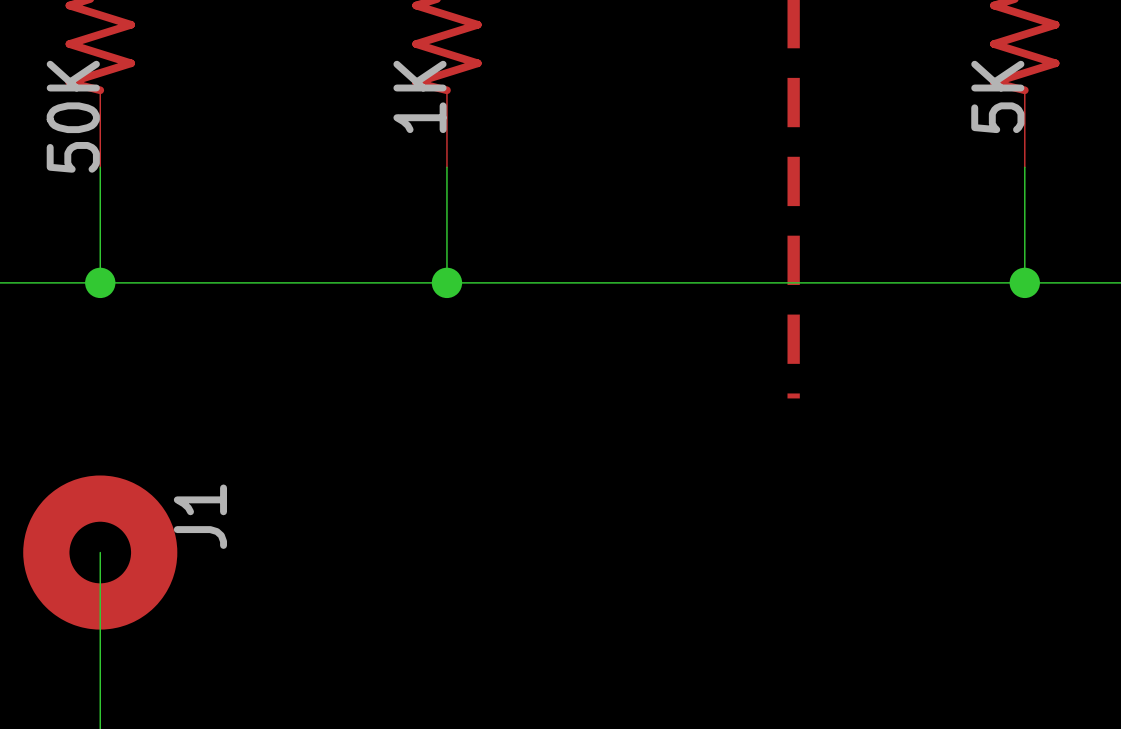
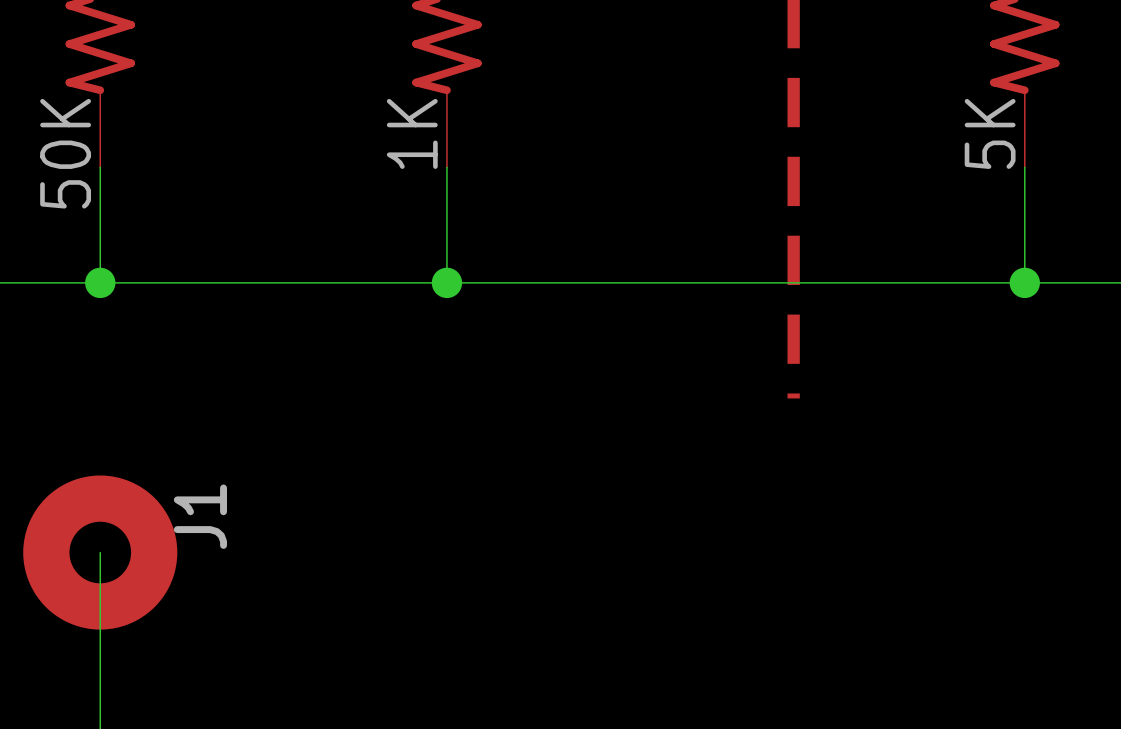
part value position: 1K (419, 96) -> 1K (412, 133)
part value position: 5K (997, 96) -> 5K (990, 133)
part value position: 50K (73, 116) -> 50K (65, 153)

